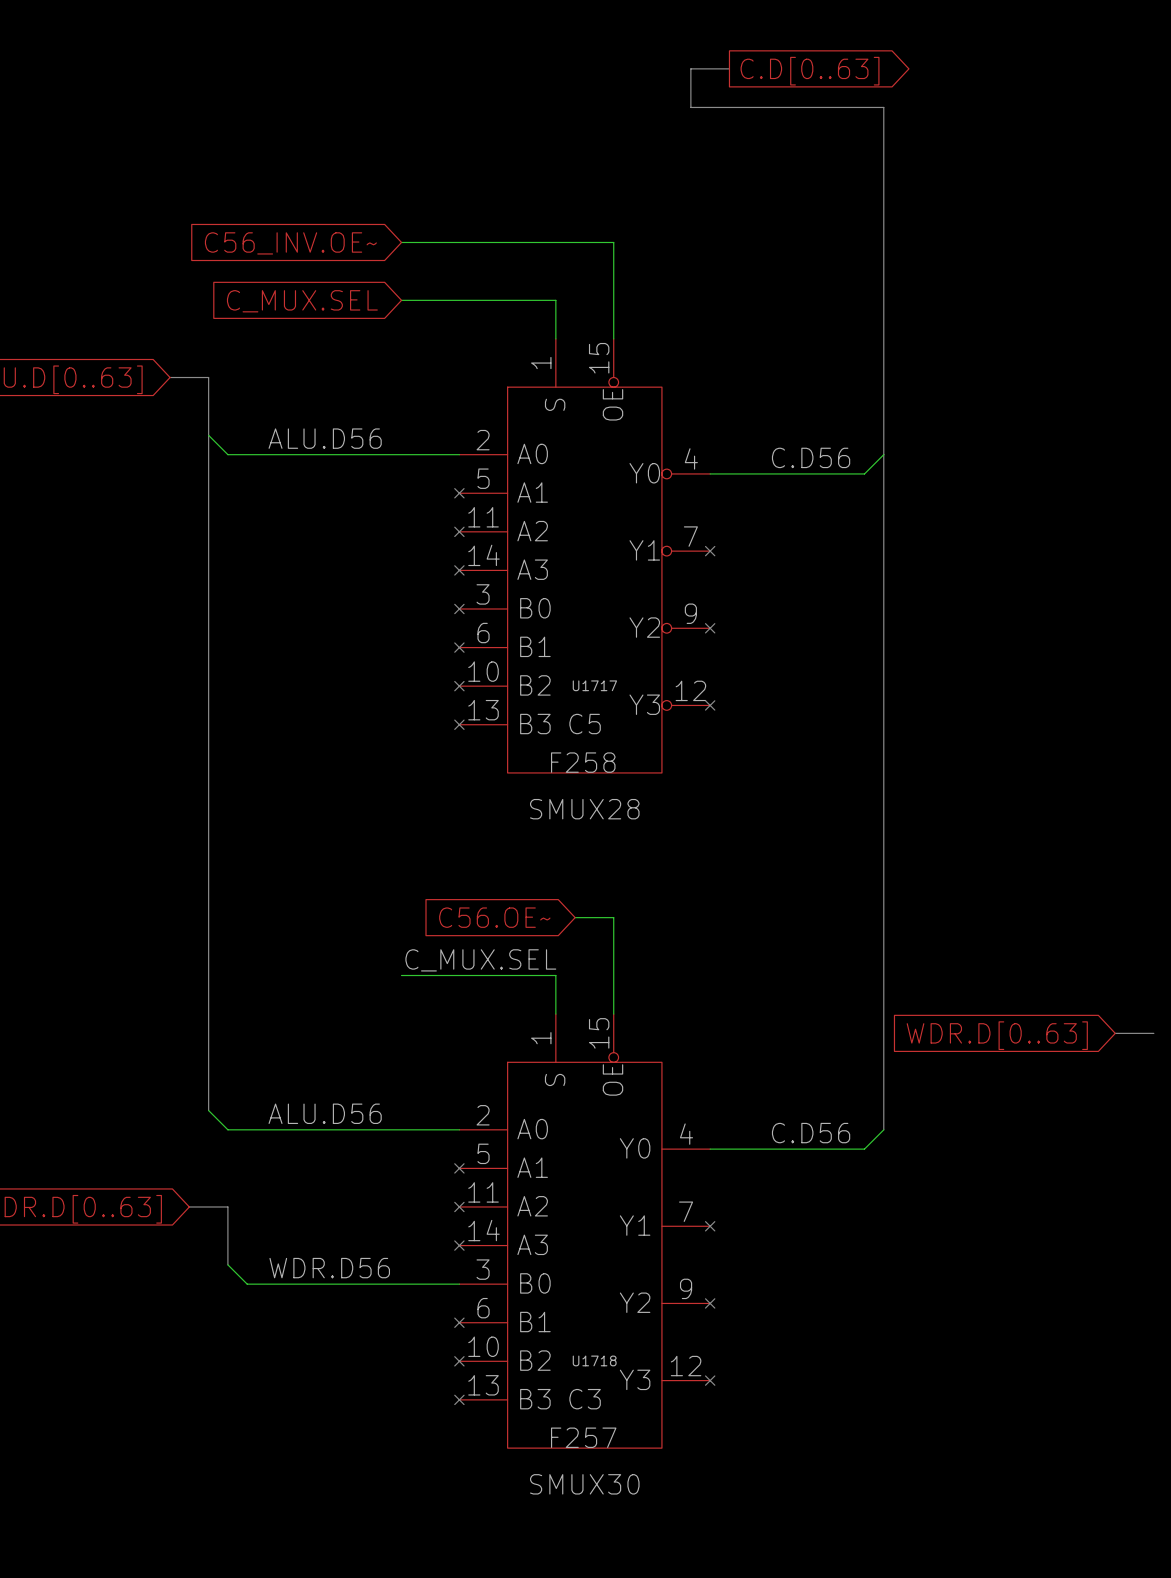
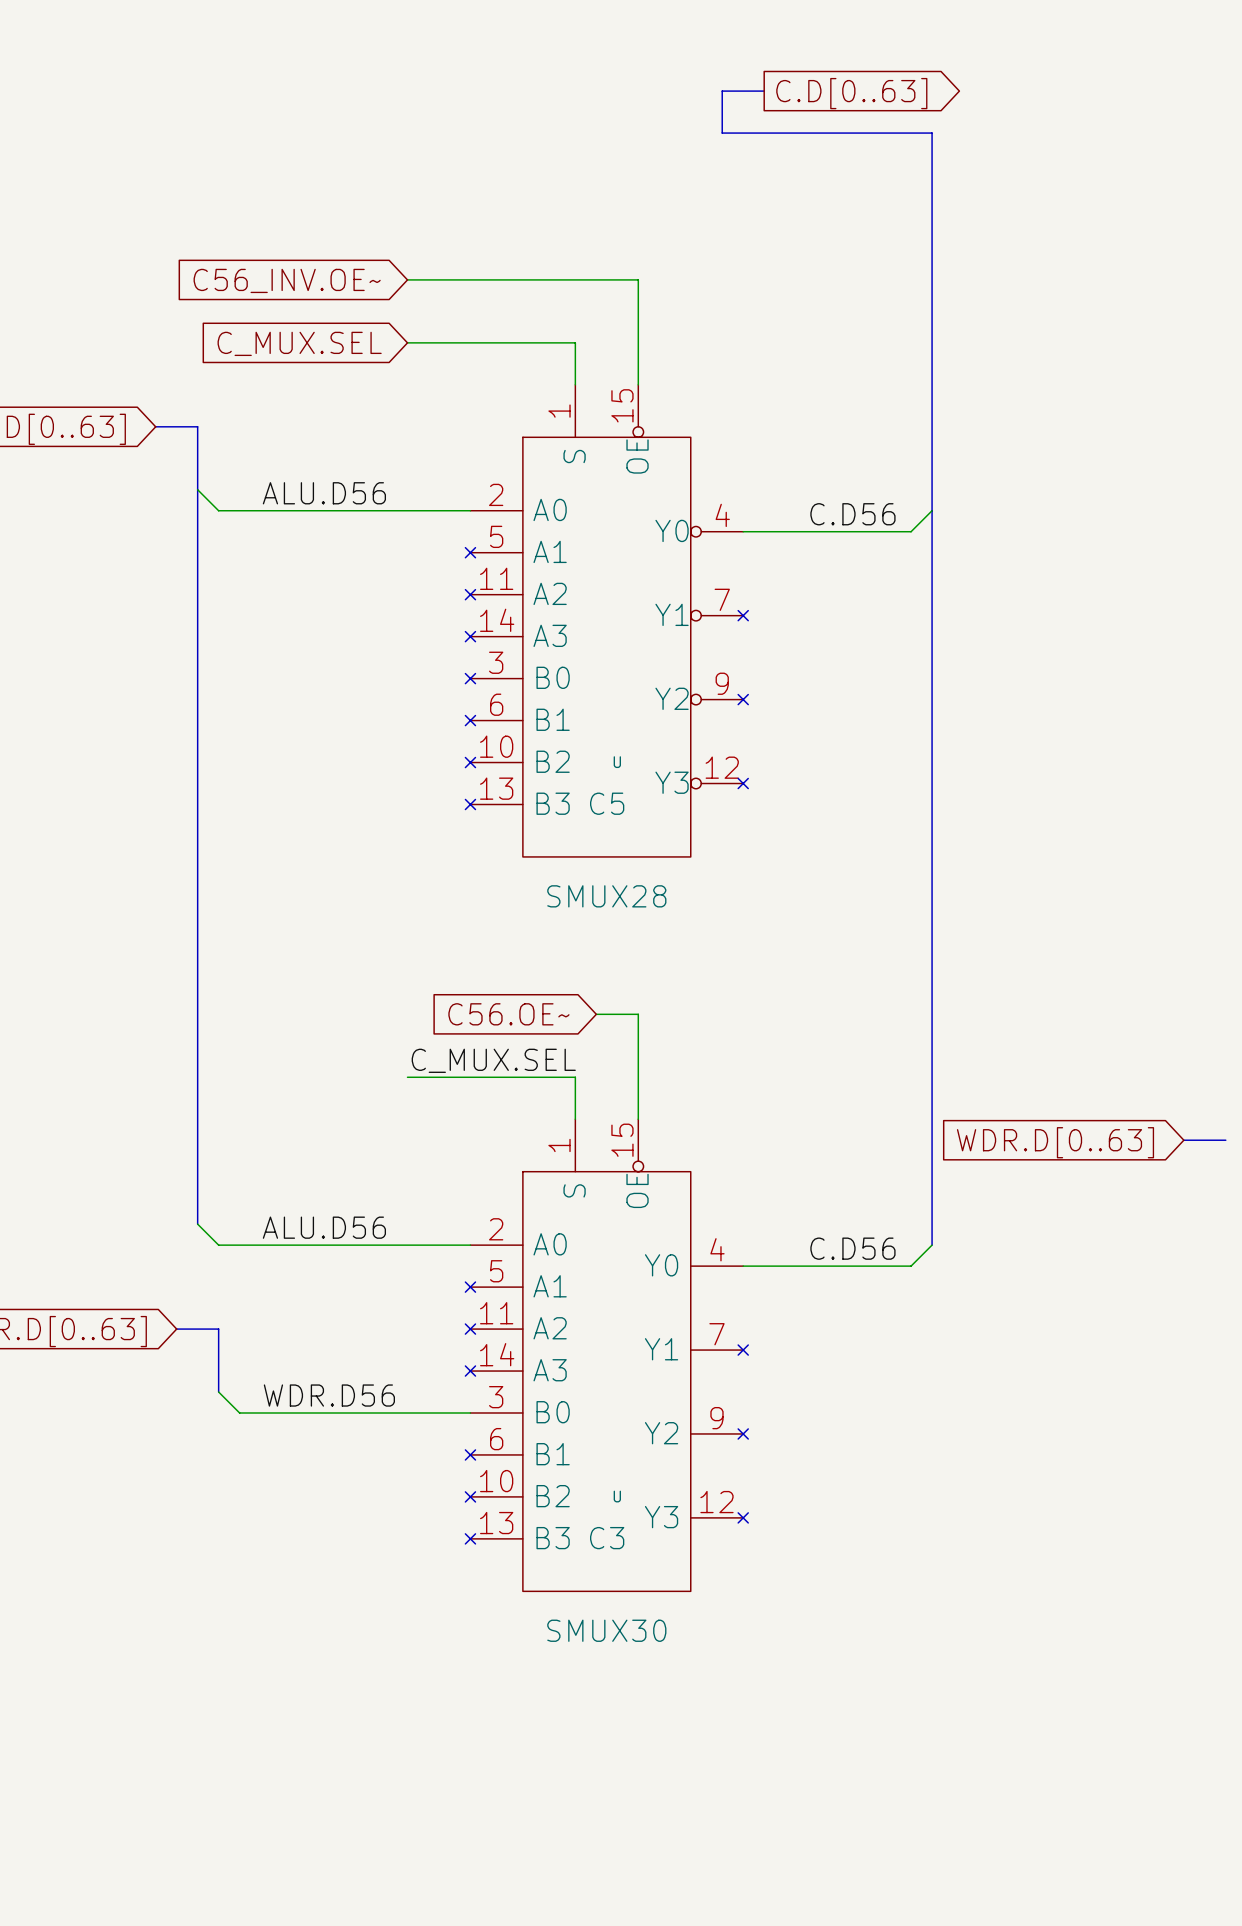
U1717 name: U1717 (594, 685) -> U (617, 762)
U1717 value: F258 (583, 762) -> none
U1718 name: U1718 (594, 1360) -> U (617, 1496)
U1718 value: F257 (583, 1437) -> none

